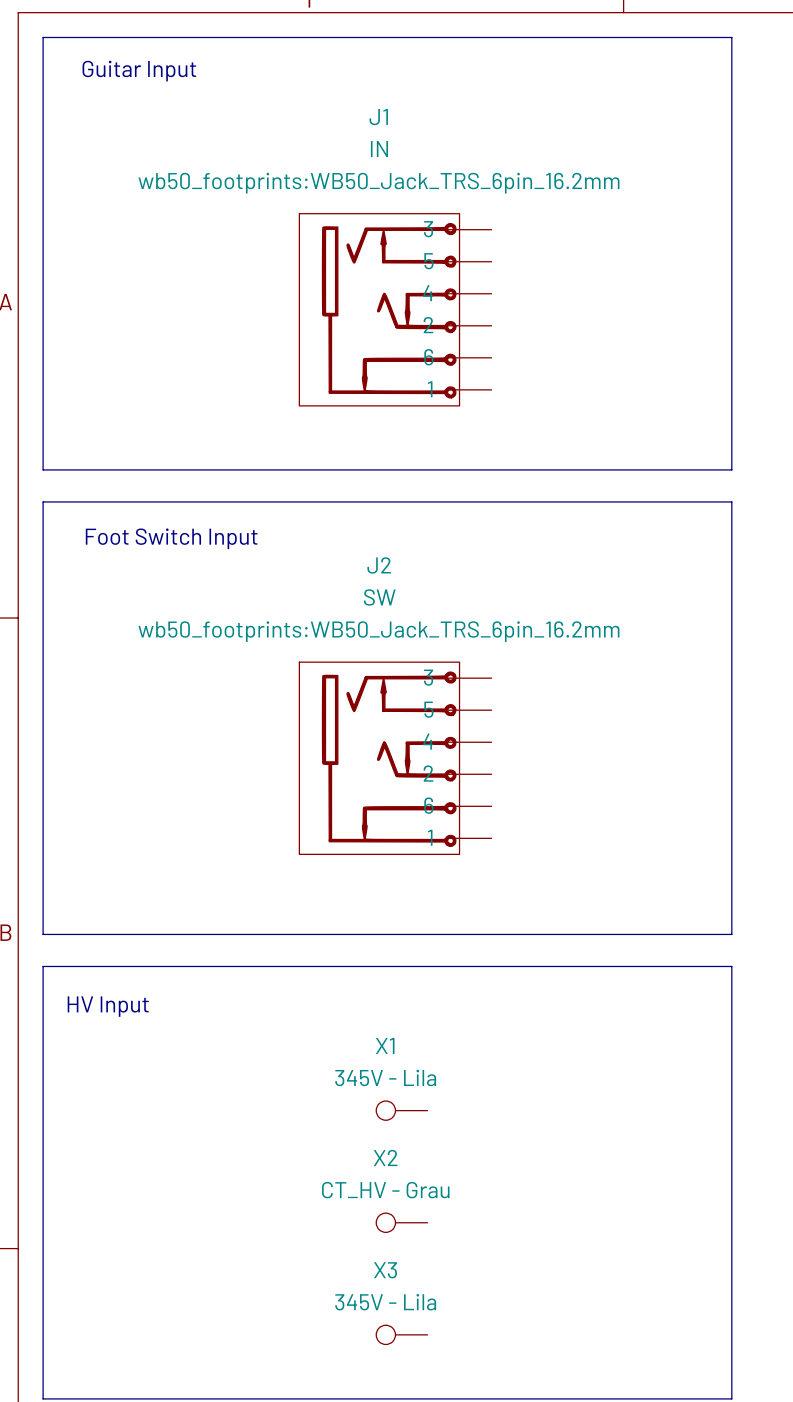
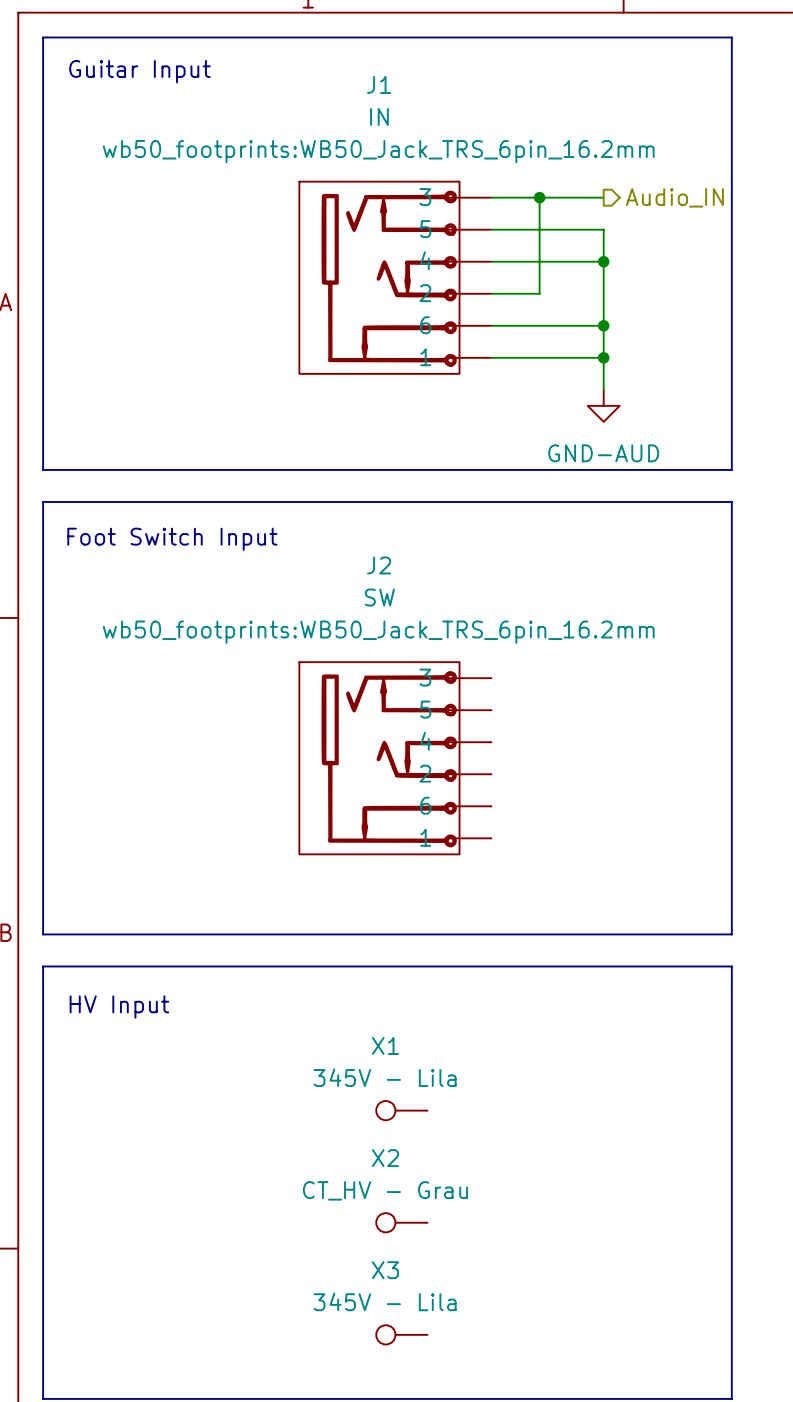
wire: none -> (491, 197) (603, 197)
wire: none -> (539, 197) (539, 293) (491, 293)
junction: none -> (539, 197)
hierarchical label: none -> Audio_IN (674, 197)
wire: none -> (491, 229) (603, 229) (603, 389)
wire: none -> (491, 261) (603, 261)
junction: none -> (603, 261)
J1 position: (395, 309) -> (395, 277)
wire: none -> (491, 325) (603, 325)
junction: none -> (603, 325)
wire: none -> (491, 357) (603, 357)
junction: none -> (603, 357)
power symbol: none -> GND-AUD (603, 405)

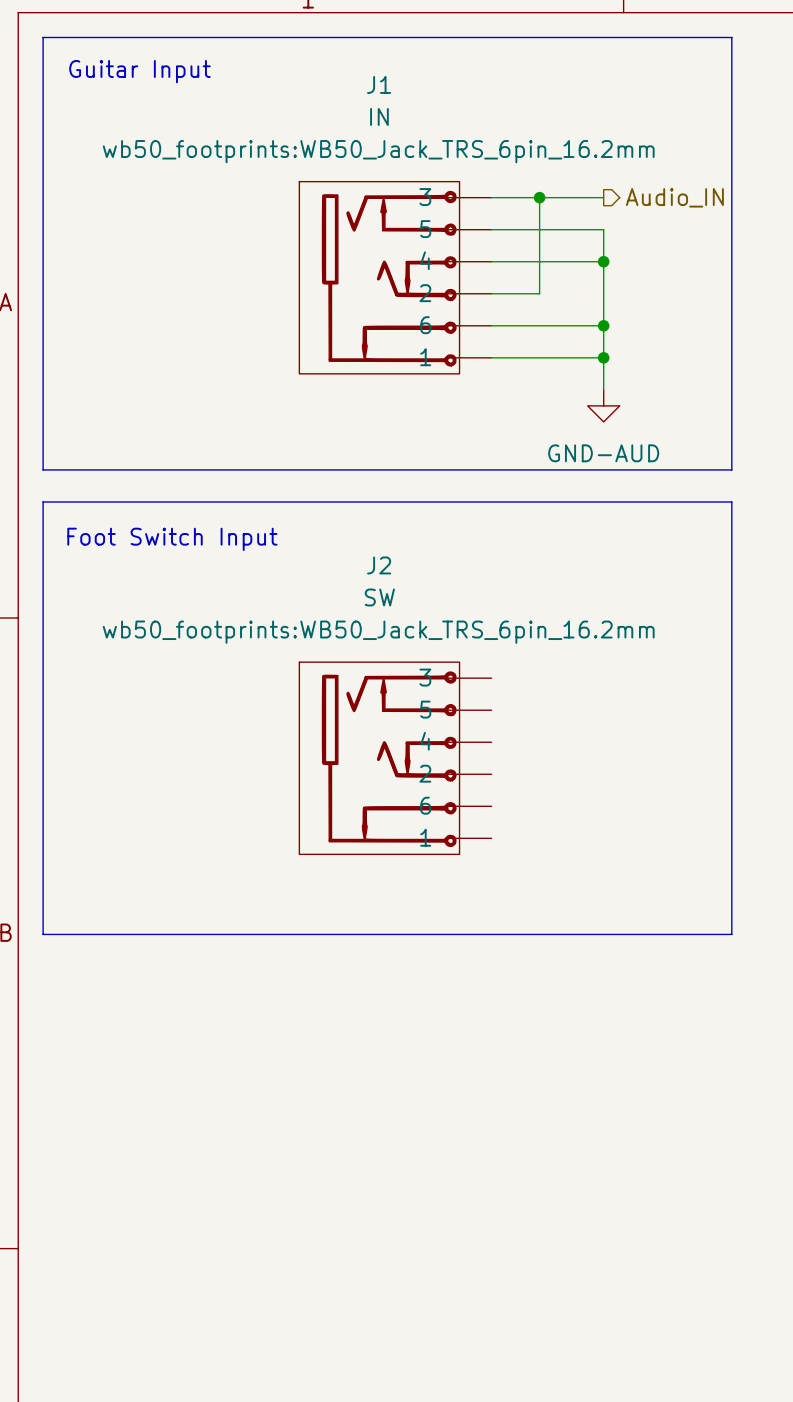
line: (43, 966) (731, 966) (731, 1398) (43, 1398) (43, 966) -> none
text: HV Input (119, 1007) -> none
X1: 345V - Lila (401, 1110) -> none
X2: CT_HV - Grau (401, 1222) -> none
X3: 345V - Lila (401, 1334) -> none

